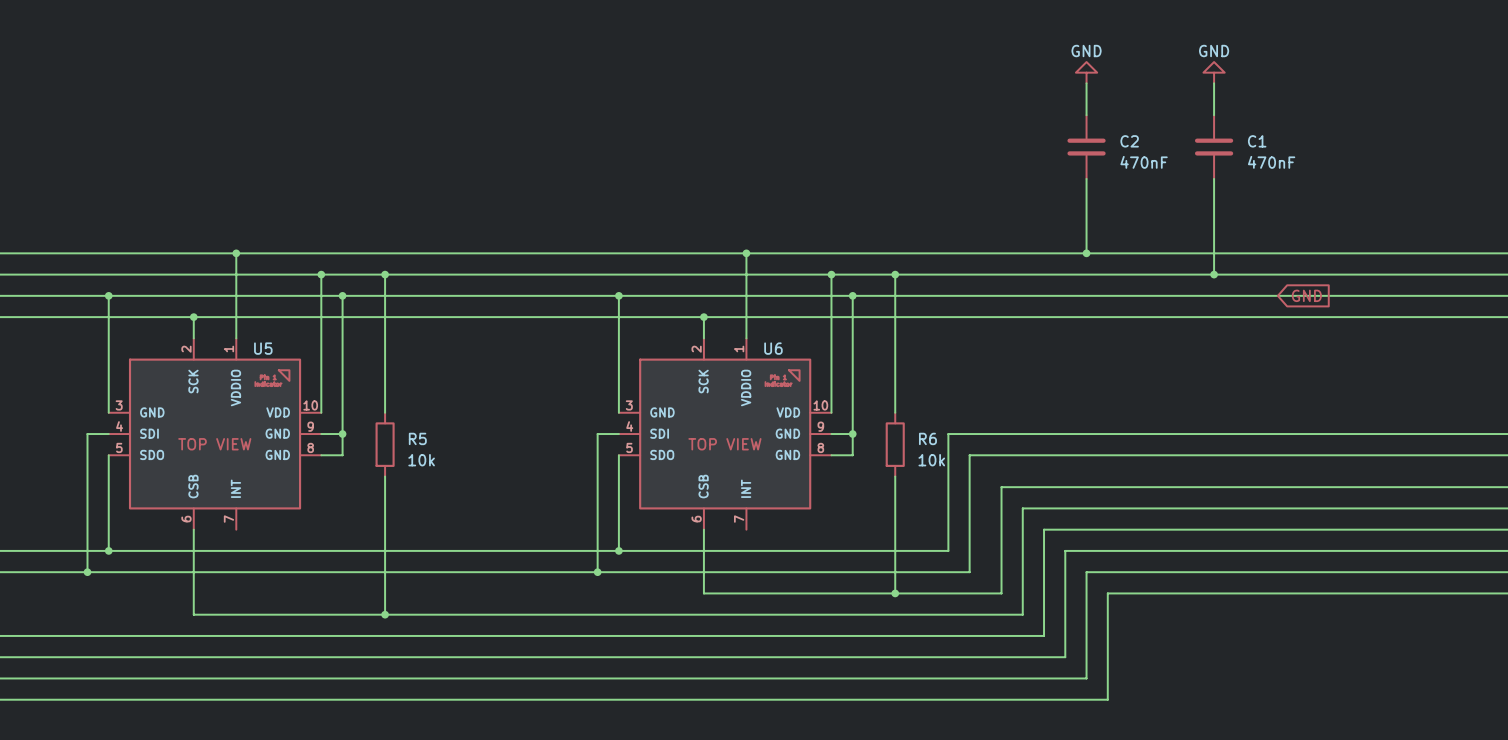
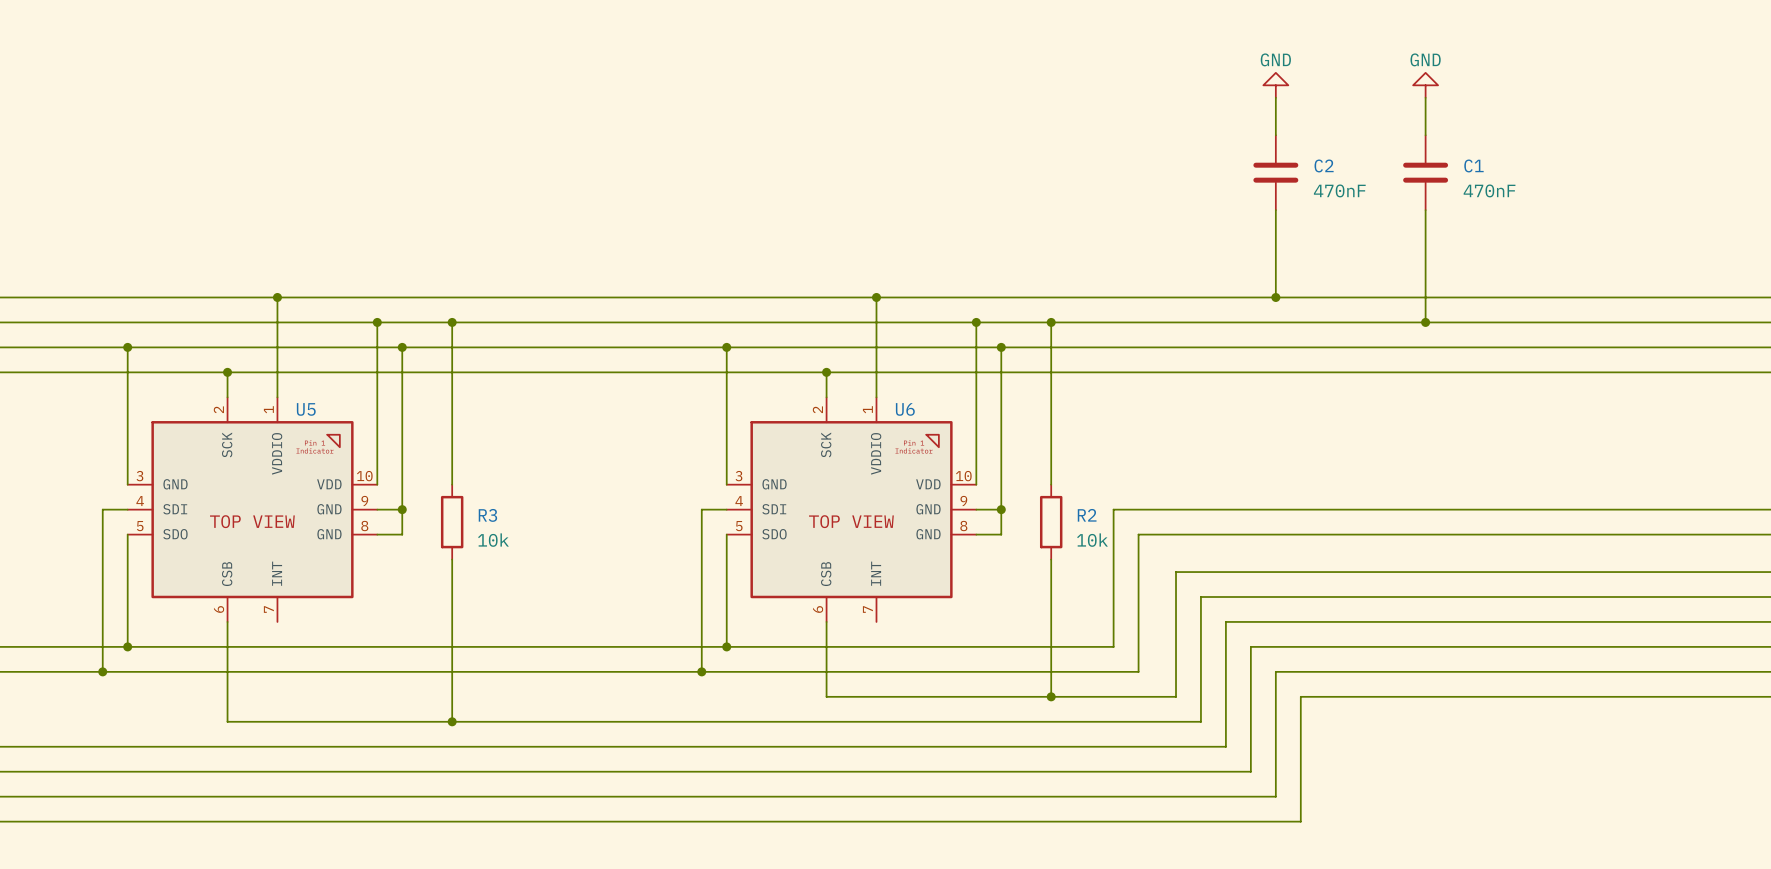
global label: GND (1306, 295) -> none
R5 name: R5 (417, 438) -> R3 (487, 515)
R6 name: R6 (927, 438) -> R2 (1087, 515)

